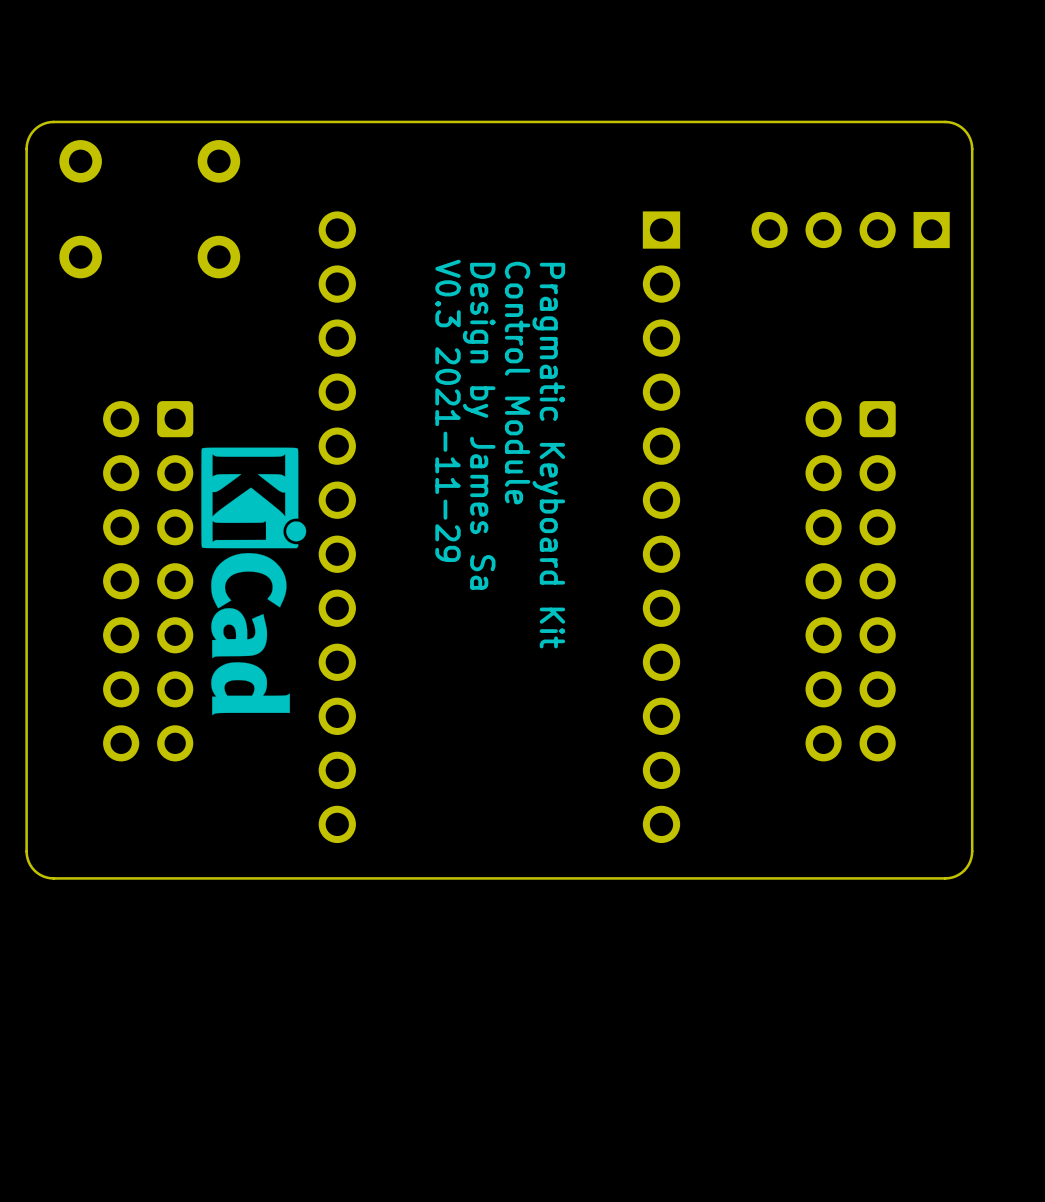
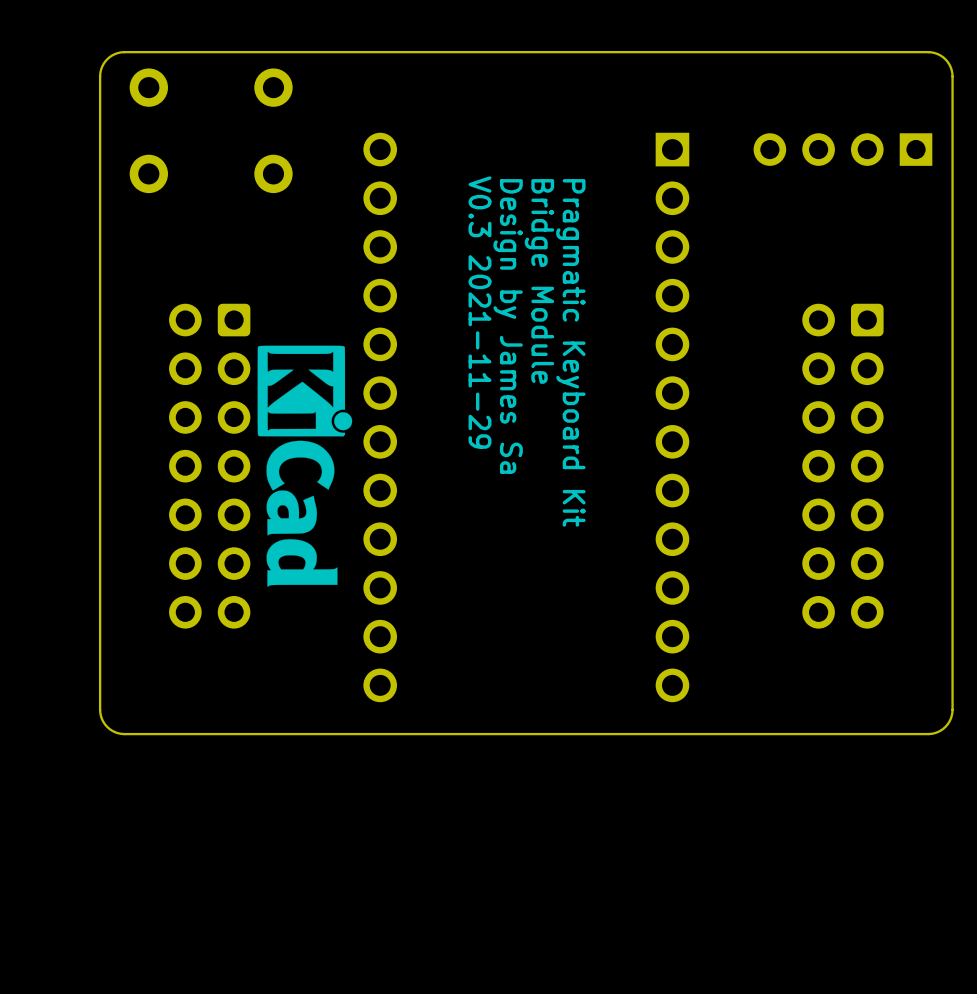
text: Control Module (517, 383) -> Bridge Module (539, 281)

